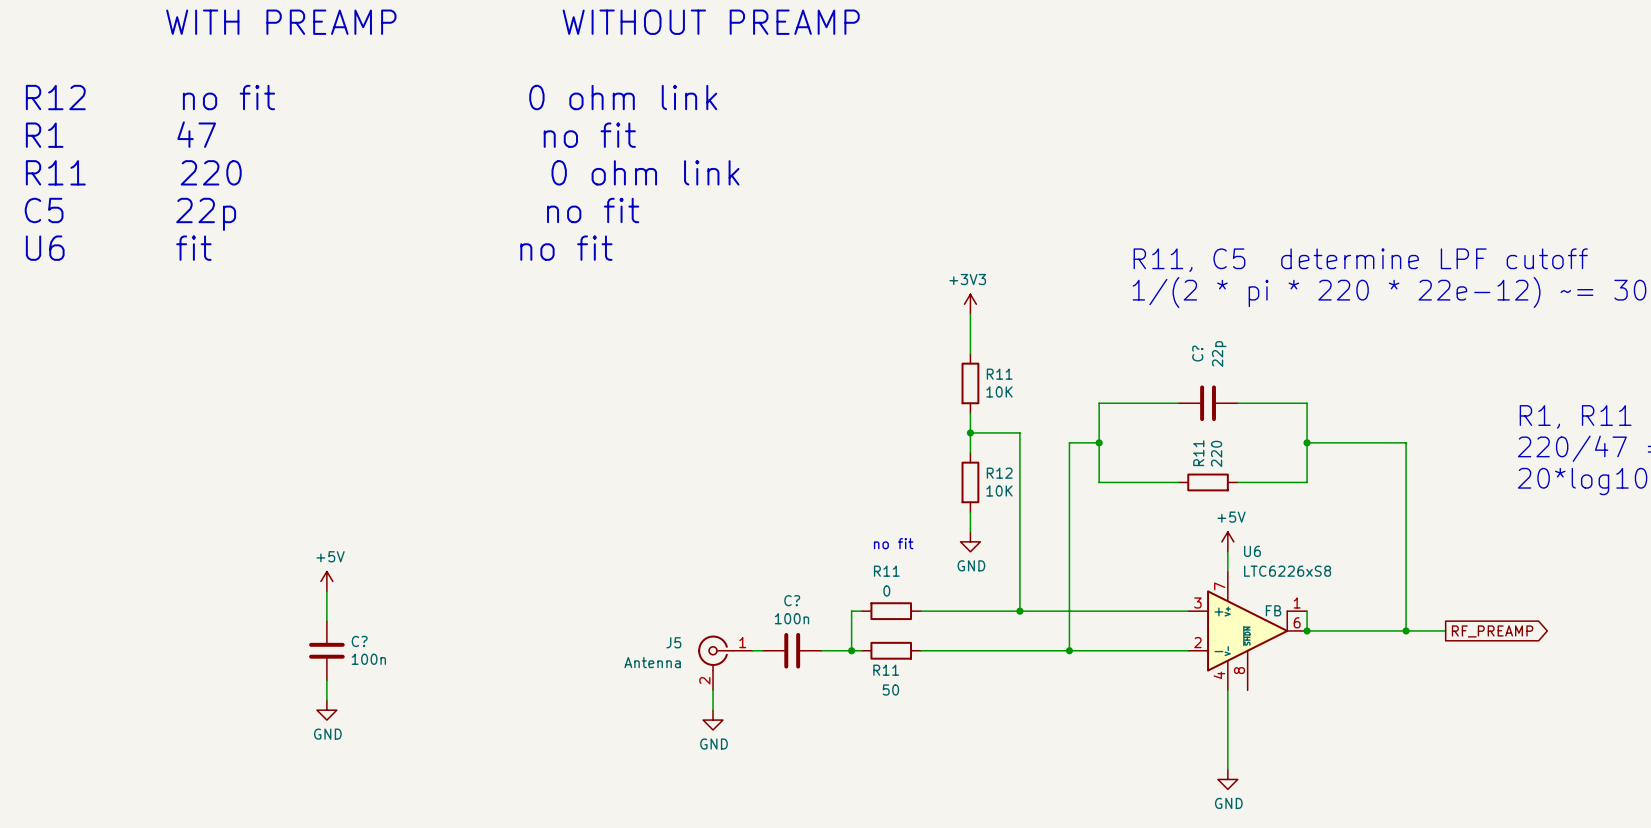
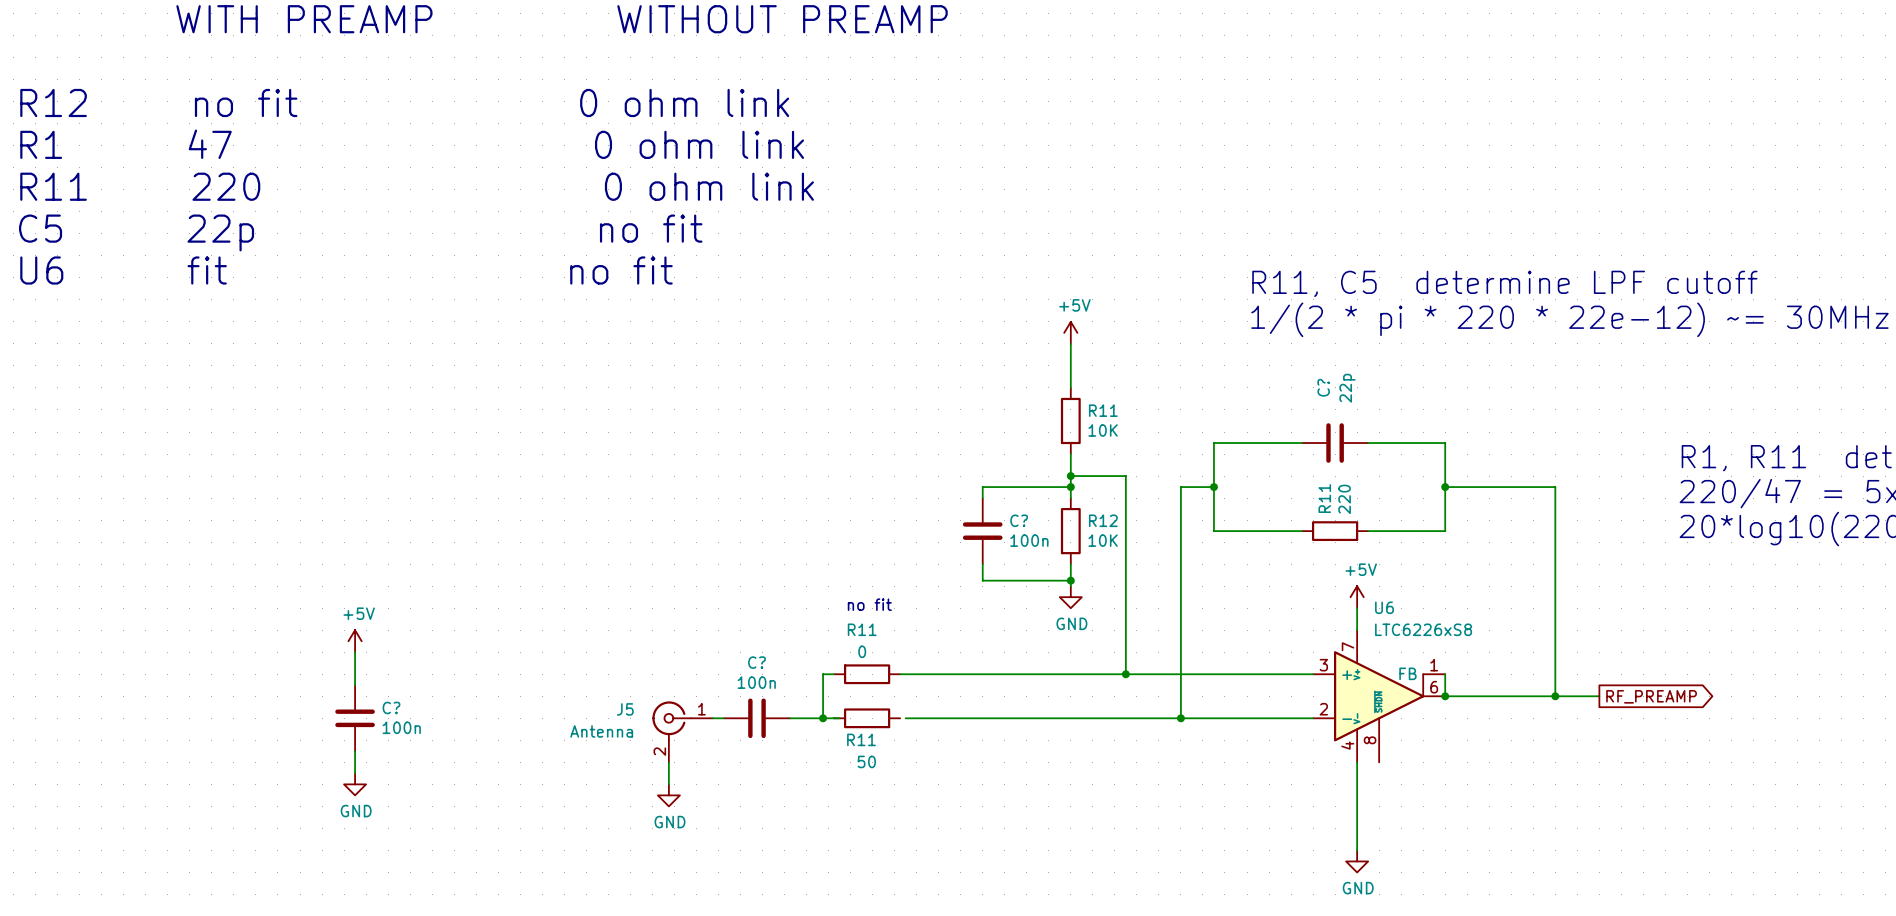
text: R1 47 no fit (330, 134) -> R1 47 0 ohm link (412, 144)
power symbol: +3V3 (970, 304) -> +5V (1070, 332)
wire: none -> (1070, 487) (982, 487) (982, 498)
junction: none -> (1070, 487)
C?: none -> 100n (982, 531)
wire: none -> (982, 564) (982, 580) (1070, 580)
junction: none -> (1070, 580)
text position: no fit (893, 543) -> no fit (869, 604)
wire: none -> (834, 674) (823, 674) (823, 718)
wire: (851, 611) (851, 650) -> (938, 674) (900, 674)
wire: none -> (949, 674) (1015, 674)
R11 position: (891, 611) -> (867, 674)
wire: none -> (712, 718) (723, 718)
C?: none -> 100n (756, 718)
junction: none -> (823, 718)
C?: 100n (792, 650) -> none
junction: (851, 650) -> none
wire: none -> (949, 718) (1015, 718)
R11 position: (891, 650) -> (867, 718)
J5 position: (725, 662) -> (682, 731)
wire: (713, 690) (713, 710) -> (668, 762) (668, 784)
power symbol position: GND (713, 720) -> GND (668, 795)

